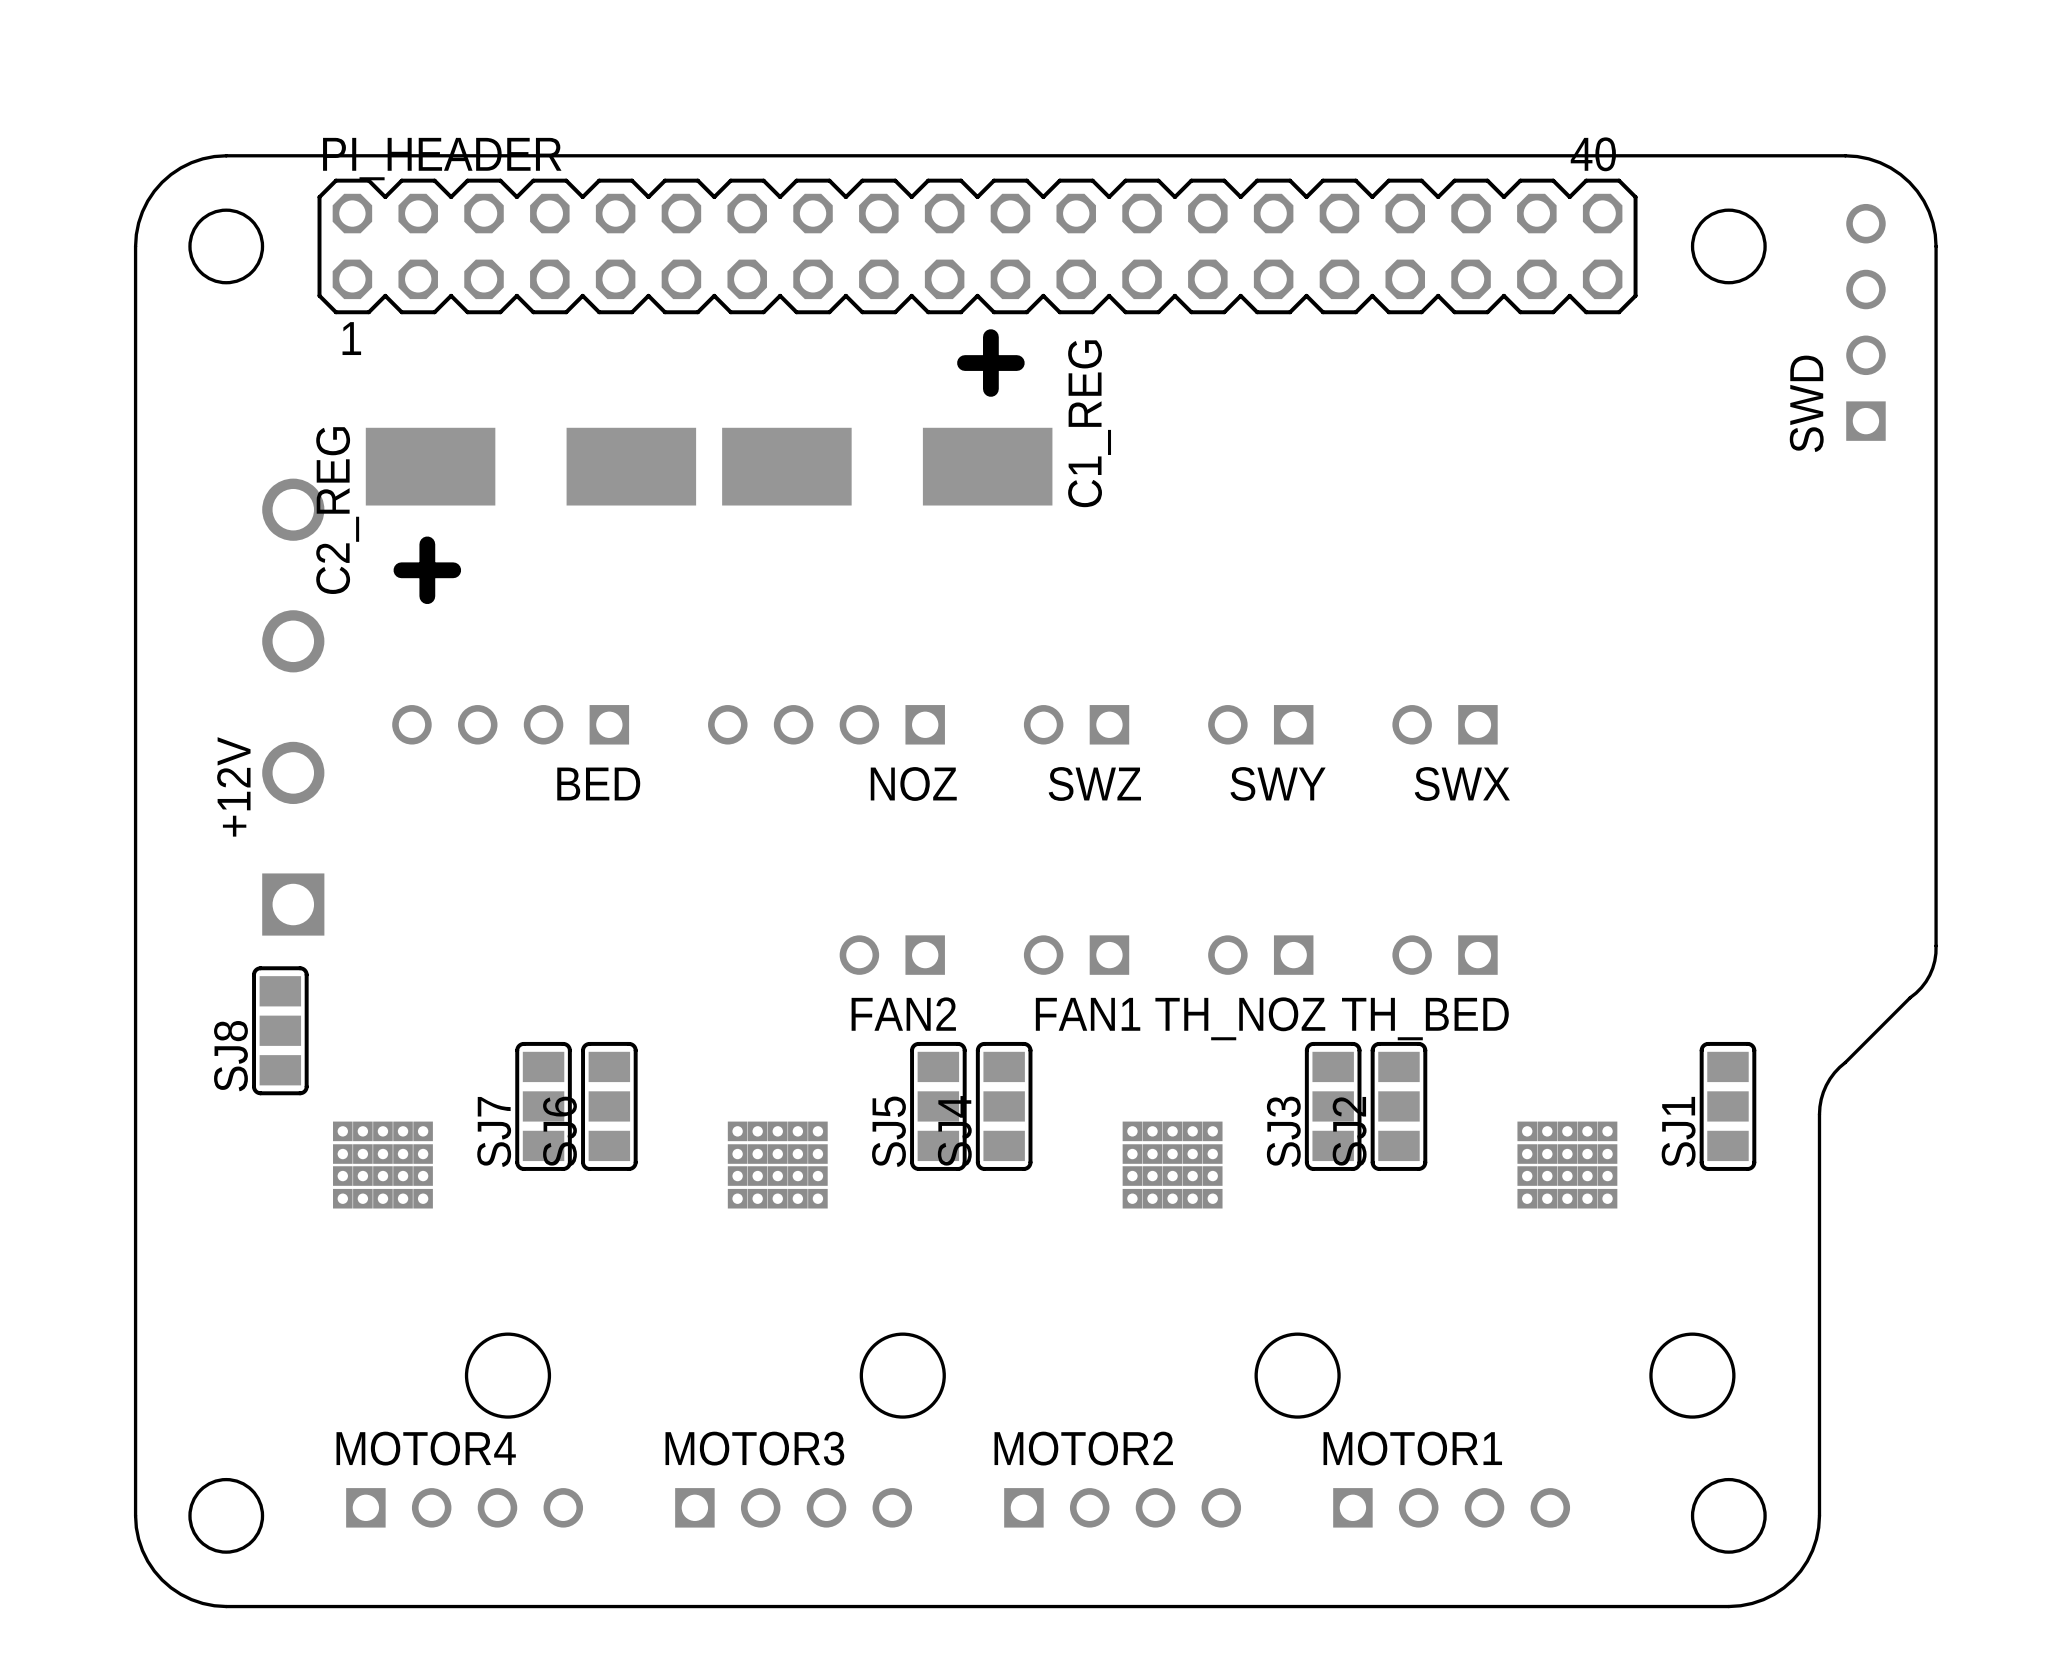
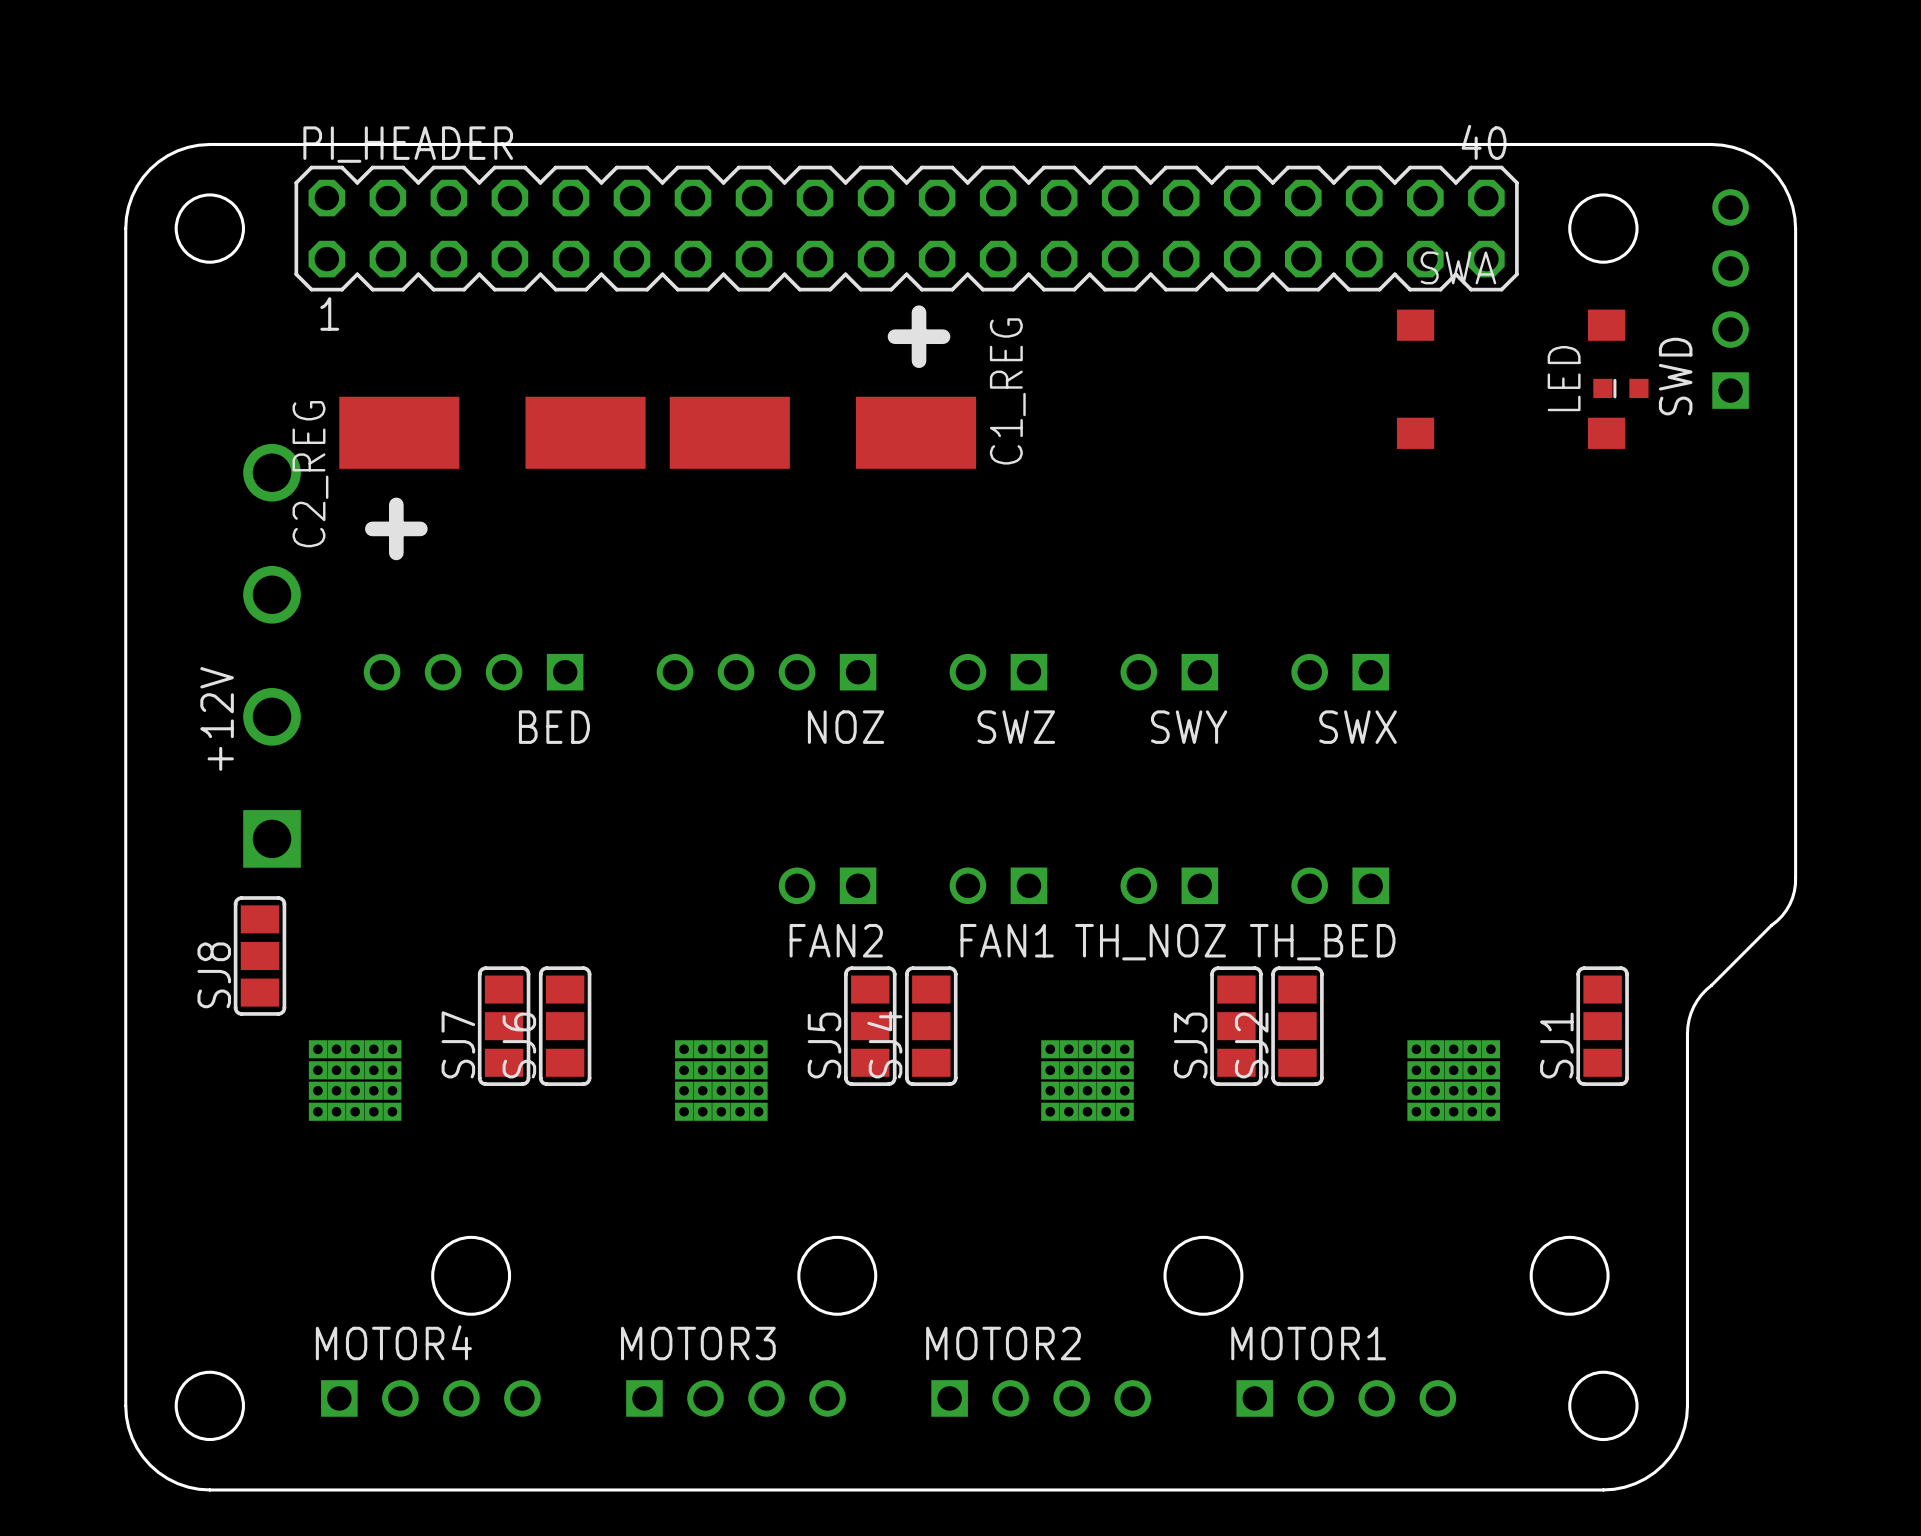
SWA: none -> (1511, 379)
LED: none -> (1620, 388)

